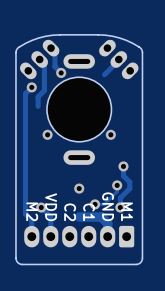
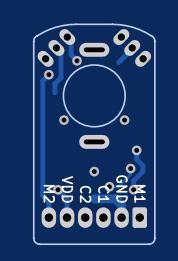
part footprint: [46, 54, 112, 165] -> [62, 42, 126, 149]

